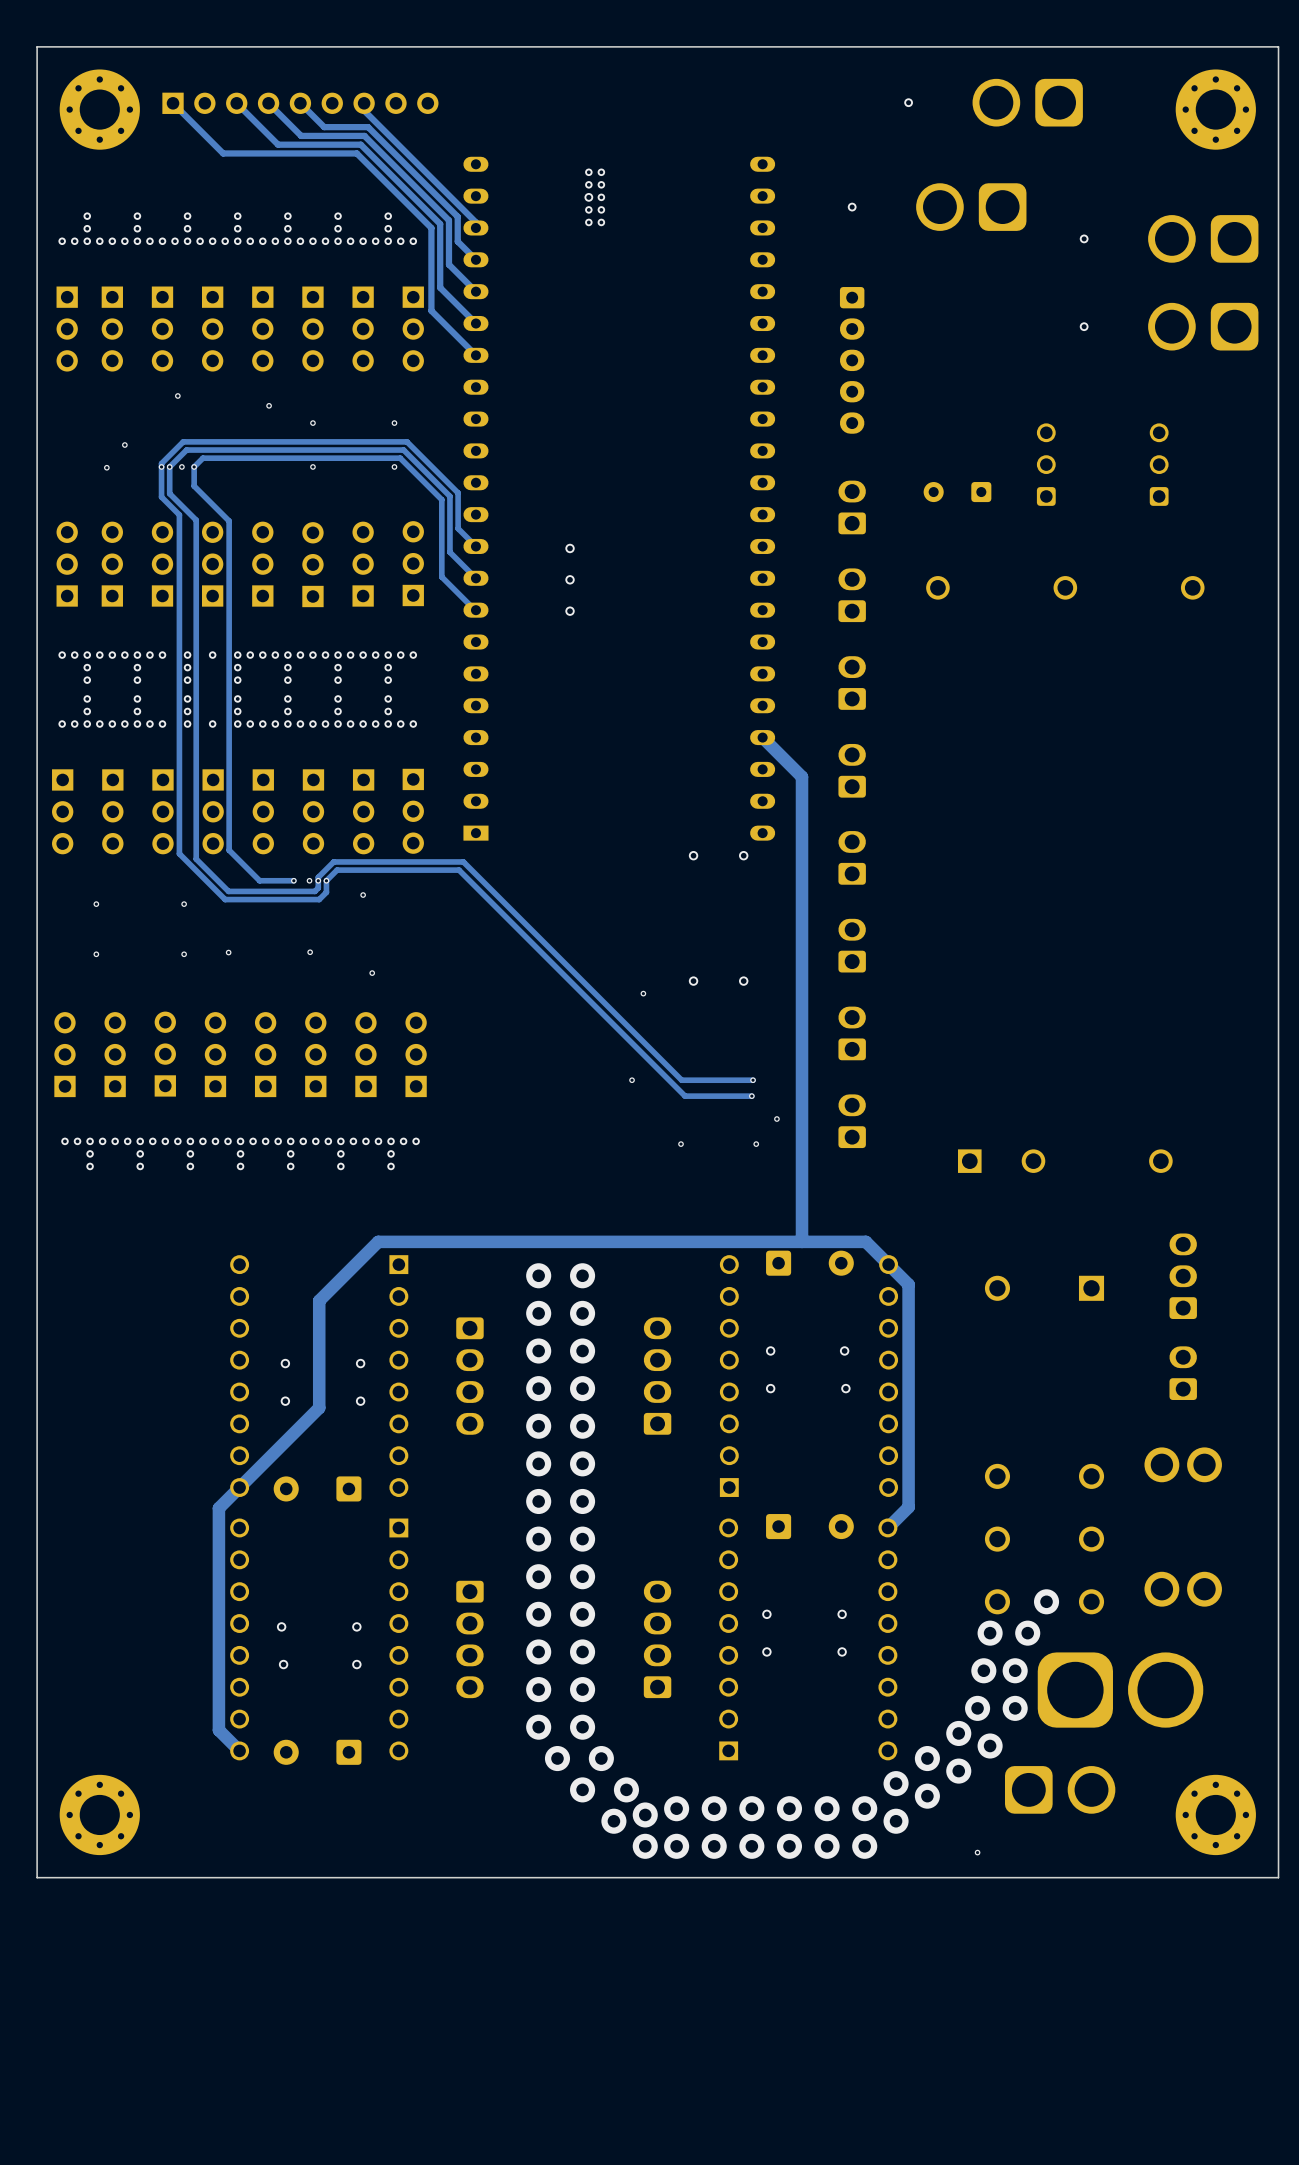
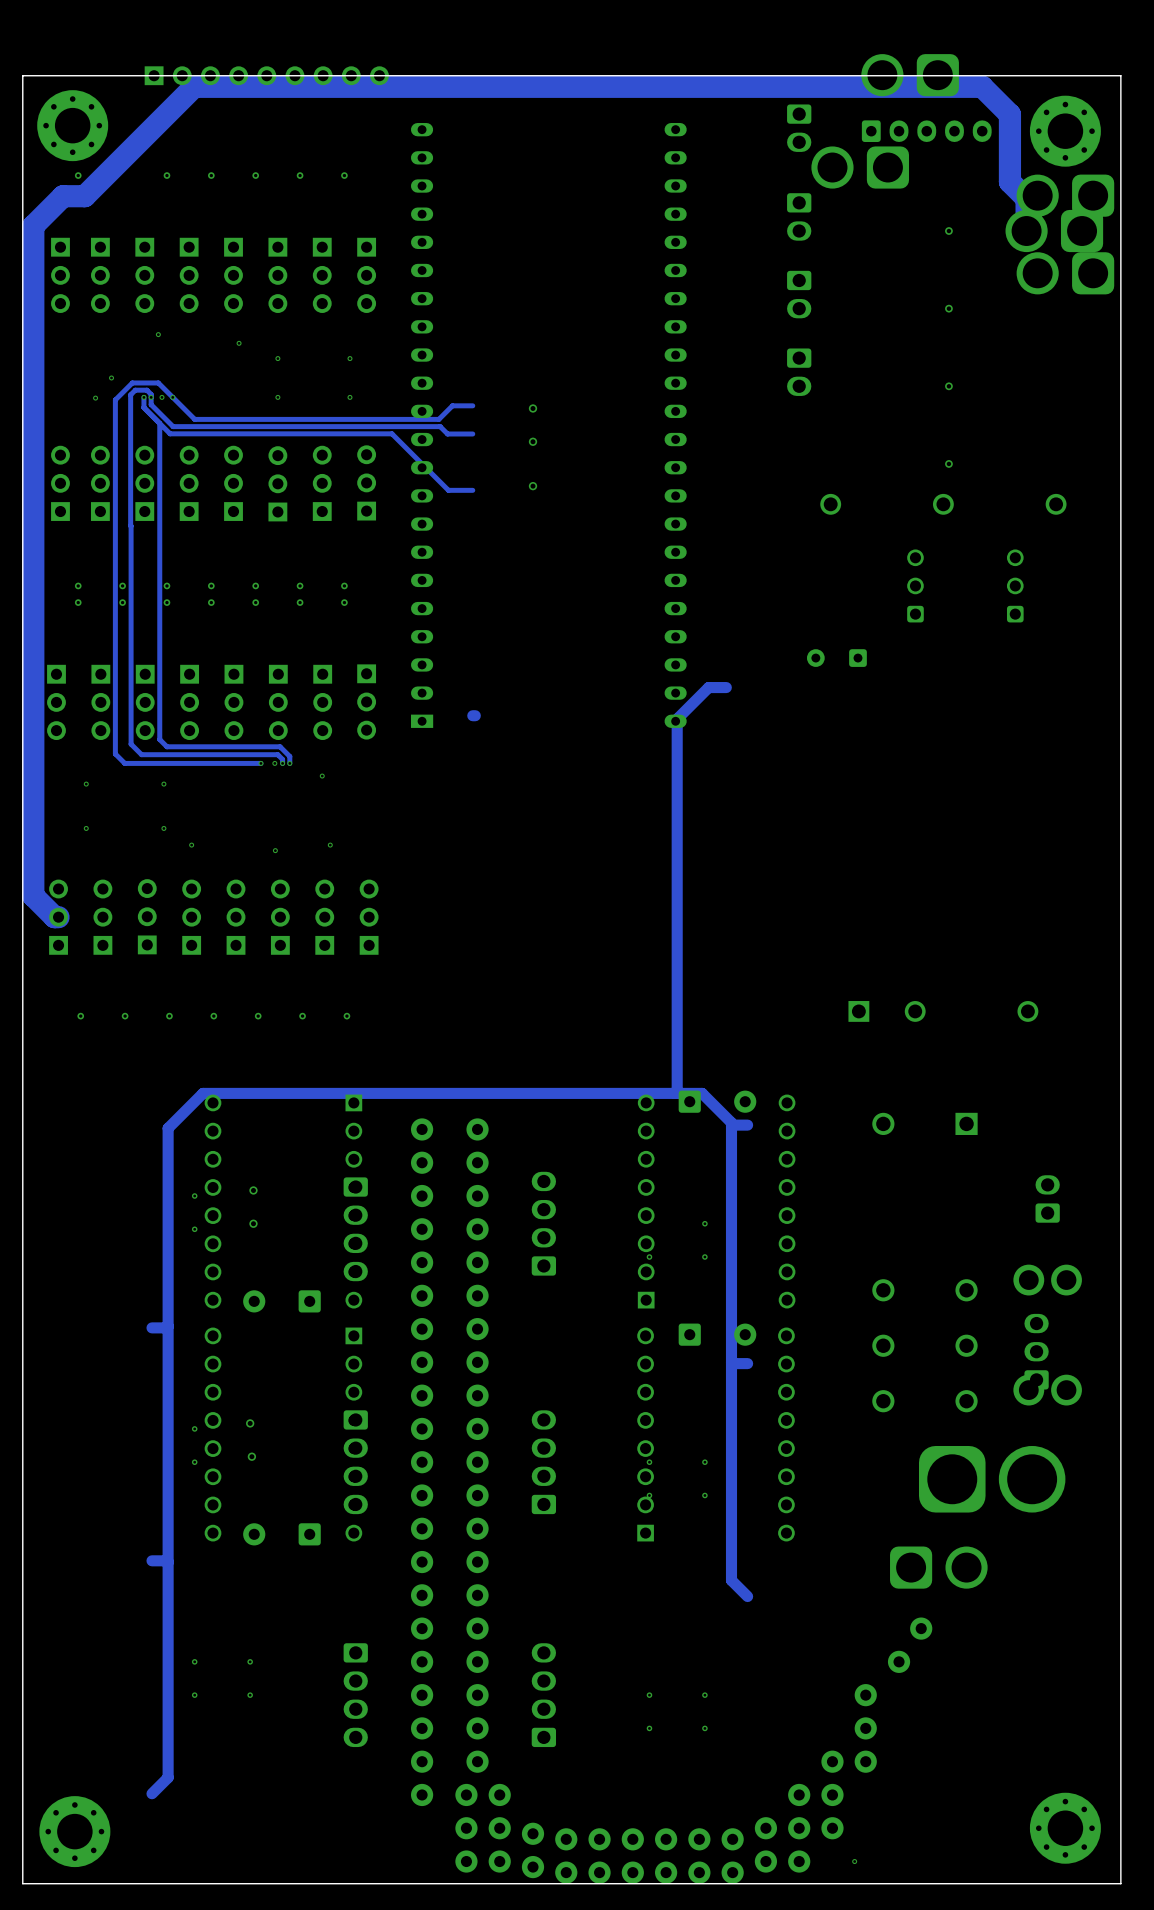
board edge: (1278, 46) (37, 46) (37, 1877) (1278, 1877) (1278, 46) -> (1120, 75) (1120, 1883) (22, 1883) (22, 75) (1120, 75)
via: (908, 102) -> none
track: (173, 103) (223, 153) (356, 153) (431, 228) (431, 310) (475, 355) -> none
track: (236, 103) (278, 144) (360, 144) (440, 224) (440, 287) (475, 323) -> none
track: (268, 103) (301, 135) (364, 135) (448, 220) (448, 264) (475, 291) -> none
track: (300, 103) (324, 127) (368, 127) (457, 216) (457, 241) (475, 259) -> none
track: (364, 103) (364, 110) (475, 222) (475, 227) -> none
part position: (99, 109) -> (72, 125)
part position: (1215, 109) -> (1065, 131)
part: none -> (799, 128)
via: (588, 172) -> none
via: (601, 172) -> none
via: (588, 184) -> none
via: (601, 184) -> none
via: (588, 197) -> none
via: (601, 197) -> none
via: (852, 207) -> none
via: (588, 209) -> none
via: (601, 209) -> none
via: (137, 216) -> none
via: (588, 222) -> none
via: (601, 222) -> none
via: (87, 228) -> none
via: (137, 228) -> none
via: (187, 228) -> none
via: (237, 228) -> none
via: (287, 228) -> none
via: (338, 228) -> none
via: (388, 228) -> none
via: (1084, 238) -> none
via: (62, 241) -> none
via: (74, 241) -> none
via: (87, 241) -> none
via: (99, 241) -> none
via: (112, 241) -> none
via: (124, 241) -> none
via: (137, 241) -> none
via: (149, 241) -> none
via: (162, 241) -> none
via: (175, 241) -> none
via: (187, 241) -> none
via: (200, 241) -> none
via: (212, 241) -> none
via: (225, 241) -> none
via: (237, 241) -> none
via: (250, 241) -> none
via: (262, 241) -> none
via: (275, 241) -> none
via: (287, 241) -> none
via: (300, 241) -> none
via: (312, 241) -> none
via: (325, 241) -> none
via: (338, 241) -> none
via: (350, 241) -> none
via: (363, 241) -> none
via: (375, 241) -> none
via: (388, 241) -> none
via: (400, 241) -> none
via: (413, 241) -> none
part: none -> (799, 216)
via: none -> (948, 231)
track: none -> (1026, 231) (1026, 198) (1009, 181) (1009, 114) (982, 86) (194, 86) (84, 196) (63, 196) (33, 226) (33, 895) (54, 917) (58, 917)
part: none -> (1054, 231)
via: (1084, 326) -> none
part: none -> (799, 294)
part rotation: 0° (852, 360) -> 90° counterclockwise (926, 131)
part position: (852, 360) -> (926, 131)
via: none -> (948, 308)
part: none -> (799, 372)
via: none -> (948, 386)
part: (1046, 464) -> none
part: (1159, 464) -> none
track: (161, 466) (161, 463) (183, 441) (407, 441) (458, 492) (458, 528) (475, 546) -> none
track: (169, 466) (186, 450) (403, 450) (449, 496) (449, 552) (475, 578) -> (151, 397) (151, 394) (146, 390) (135, 390) (130, 394) (131, 744) (141, 754) (277, 754) (282, 760)
track: (169, 475) (169, 493) (196, 520) (196, 859) (228, 891) (314, 891) (318, 888) (318, 880) -> (151, 404) (173, 426) (440, 426) (447, 433) (472, 433)
track: (161, 478) (161, 497) (179, 514) -> (159, 423) (159, 439)
track: none -> (143, 407) (170, 433) (391, 433) (448, 490) (472, 490)
via: none -> (533, 408)
part position: (957, 492) -> (836, 658)
part: (852, 507) -> none
via: none -> (533, 441)
via: none -> (948, 463)
via: (570, 548) -> none
via: none -> (533, 486)
via: (570, 579) -> none
part: (852, 595) -> none
track: (475, 610) (441, 577) (441, 499) (400, 458) (202, 458) (194, 466) (194, 486) (229, 521) (229, 850) (259, 880) -> (472, 405) (452, 405) (438, 419) (194, 419) (158, 382) (132, 382) (115, 399) (115, 753) (124, 763) (230, 763)
via: (570, 611) -> none
via: (62, 655) -> none
via: (74, 655) -> none
via: (87, 655) -> none
via: (99, 655) -> none
via: (112, 655) -> none
via: (124, 655) -> none
via: (137, 655) -> none
via: (149, 655) -> none
via: (162, 655) -> none
via: (187, 655) -> none
via: (212, 655) -> none
via: (237, 655) -> none
via: (250, 655) -> none
via: (262, 655) -> none
via: (275, 655) -> none
via: (287, 655) -> none
via: (300, 655) -> none
via: (312, 655) -> none
via: (325, 655) -> none
via: (338, 655) -> none
via: (350, 655) -> none
via: (363, 655) -> none
via: (375, 655) -> none
via: (388, 655) -> none
via: (400, 655) -> none
via: (413, 655) -> none
via: (87, 667) -> none
via: (137, 667) -> none
via: (187, 667) -> none
via: (237, 667) -> none
via: (287, 667) -> none
via: (338, 667) -> none
via: (388, 667) -> none
part: none -> (915, 585)
part: none -> (1015, 585)
part: (852, 683) -> none
via: (87, 711) -> none
via: (137, 711) -> none
via: (187, 711) -> none
via: (237, 711) -> none
via: (287, 711) -> none
via: (338, 711) -> none
via: (388, 711) -> none
via: (62, 724) -> none
via: (74, 724) -> none
via: (87, 724) -> none
via: (99, 724) -> none
via: (112, 724) -> none
via: (124, 724) -> none
via: (137, 724) -> none
via: (149, 724) -> none
via: (162, 724) -> none
via: (187, 724) -> none
via: (212, 724) -> none
via: (237, 724) -> none
via: (250, 724) -> none
via: (262, 724) -> none
via: (275, 724) -> none
via: (287, 724) -> none
via: (300, 724) -> none
via: (312, 724) -> none
via: (325, 724) -> none
via: (338, 724) -> none
via: (350, 724) -> none
via: (363, 724) -> none
via: (375, 724) -> none
via: (388, 724) -> none
via: (400, 724) -> none
via: (413, 724) -> none
track: (762, 737) (802, 776) (802, 1241) -> none
part: (852, 770) -> none
track: none -> (726, 687) (708, 687) (677, 719) (677, 1091) (675, 1093)
track: none -> (475, 715) (472, 715)
via: (693, 855) -> none
via: (743, 855) -> none
part: (852, 857) -> none
track: (187, 861) (225, 899) (319, 899) (326, 892) (326, 880) (337, 870) (459, 870) (685, 1096) (751, 1096) -> (166, 746) (280, 746) (289, 756) (289, 763)
track: (318, 877) (333, 861) (463, 861) (681, 1080) (753, 1080) -> none
part: (852, 945) -> none
via position: (228, 952) -> (191, 845)
via position: (310, 952) -> (275, 850)
via: (693, 981) -> none
via: (743, 981) -> none
via: (643, 993) -> none
part: (852, 1033) -> none
via: (632, 1080) -> none
via: (753, 1080) -> none
via: (751, 1096) -> none
via: (776, 1119) -> none
part: (852, 1121) -> none
via: (64, 1141) -> none
via: (77, 1141) -> none
via: (90, 1141) -> none
via: (102, 1141) -> none
via: (115, 1141) -> none
via: (127, 1141) -> none
via: (140, 1141) -> none
via: (152, 1141) -> none
via: (165, 1141) -> none
via: (177, 1141) -> none
via: (190, 1141) -> none
via: (202, 1141) -> none
via: (215, 1141) -> none
via: (228, 1141) -> none
via: (240, 1141) -> none
via: (253, 1141) -> none
via: (265, 1141) -> none
via: (278, 1141) -> none
via: (290, 1141) -> none
via: (303, 1141) -> none
via: (315, 1141) -> none
via: (328, 1141) -> none
via: (340, 1141) -> none
via: (353, 1141) -> none
via: (365, 1141) -> none
via: (378, 1141) -> none
via: (391, 1141) -> none
via: (403, 1141) -> none
via: (416, 1141) -> none
via: (681, 1144) -> none
via: (756, 1144) -> none
via: (90, 1153) -> none
via: (140, 1153) -> none
via: (190, 1153) -> none
via: (240, 1153) -> none
via: (290, 1153) -> none
via: (340, 1153) -> none
via: (391, 1153) -> none
via: (538, 1275) -> none
via: (582, 1275) -> none
part position: (1183, 1276) -> (1036, 1351)
track: none -> (731, 1123) (747, 1125)
via: none -> (422, 1129)
via: none -> (477, 1129)
via: (538, 1313) -> none
via: (582, 1313) -> none
via: none -> (422, 1162)
via: none -> (477, 1162)
via: (770, 1350) -> none
via: (844, 1350) -> none
via: (538, 1351) -> none
via: (582, 1351) -> none
via: (360, 1363) -> none
via: none -> (194, 1196)
via: none -> (422, 1196)
via: none -> (477, 1196)
part: (469, 1376) -> none
part position: (657, 1376) -> (543, 1223)
via: (538, 1388) -> none
via: (582, 1388) -> none
via: (770, 1388) -> none
via: (845, 1388) -> none
via: (360, 1401) -> none
via: none -> (704, 1223)
via: none -> (194, 1229)
part: none -> (355, 1229)
via: none -> (422, 1229)
via: none -> (477, 1229)
via: (538, 1426) -> none
via: (582, 1426) -> none
via: none -> (649, 1257)
via: none -> (704, 1256)
via: none -> (422, 1262)
via: none -> (477, 1262)
via: (538, 1463) -> none
via: (582, 1463) -> none
via: none -> (422, 1295)
via: none -> (477, 1295)
via: (538, 1501) -> none
via: (582, 1501) -> none
track: none -> (168, 1326) (151, 1327)
via: none -> (422, 1329)
via: none -> (477, 1329)
track: (887, 1527) (908, 1507) (908, 1284) (865, 1241) (378, 1241) (319, 1300) (319, 1407) (218, 1508) (218, 1730) (239, 1750) -> none
via: (538, 1539) -> none
via: (582, 1539) -> none
via: none -> (422, 1362)
via: none -> (477, 1362)
track: none -> (731, 1362) (747, 1363)
via: (538, 1576) -> none
via: (582, 1576) -> none
via: none -> (422, 1395)
via: none -> (477, 1395)
via: (1046, 1601) -> none
via: (538, 1614) -> none
via: (582, 1614) -> none
via: (766, 1614) -> none
via: (842, 1614) -> none
via: (356, 1626) -> none
via: none -> (194, 1428)
via: none -> (422, 1428)
via: none -> (477, 1428)
via: (990, 1633) -> none
via: (1027, 1633) -> none
part: (469, 1639) -> none
part position: (657, 1639) -> (543, 1462)
via: (538, 1651) -> none
via: (582, 1651) -> none
via: (766, 1651) -> none
via: (842, 1651) -> none
via: (356, 1664) -> none
via: none -> (194, 1462)
part: none -> (355, 1462)
via: none -> (422, 1462)
via: none -> (477, 1462)
via: none -> (649, 1462)
via: none -> (704, 1462)
via: (983, 1670) -> none
via: (1015, 1670) -> none
via: (538, 1689) -> none
via: (582, 1689) -> none
via: none -> (422, 1495)
via: none -> (477, 1495)
via: none -> (649, 1495)
via: none -> (704, 1495)
via: (977, 1708) -> none
via: (1015, 1708) -> none
via: (538, 1727) -> none
via: (582, 1727) -> none
via: (958, 1733) -> none
via: none -> (422, 1528)
via: none -> (477, 1528)
via: (990, 1746) -> none
via: (557, 1758) -> none
via: (601, 1758) -> none
via: (927, 1758) -> none
via: (958, 1771) -> none
track: none -> (151, 1560) (168, 1562)
via: none -> (422, 1562)
via: none -> (477, 1562)
via: (896, 1783) -> none
via: (582, 1789) -> none
via: (626, 1789) -> none
via: (927, 1796) -> none
via: (676, 1808) -> none
via: (714, 1808) -> none
via: (751, 1808) -> none
via: (789, 1808) -> none
via: (827, 1808) -> none
via: (864, 1808) -> none
part position: (99, 1814) -> (74, 1831)
via: (645, 1814) -> none
part position: (1215, 1814) -> (1065, 1828)
via: none -> (422, 1595)
via: none -> (477, 1595)
via: (613, 1821) -> none
via: (896, 1821) -> none
track: none -> (747, 1596) (731, 1580) (731, 1122) (702, 1093) (203, 1093) (168, 1128) (168, 1777) (151, 1793)
via: (645, 1846) -> none
via: (676, 1846) -> none
via: (714, 1846) -> none
via: (751, 1846) -> none
via: (789, 1846) -> none
via: (827, 1846) -> none
via: (864, 1846) -> none
via: (977, 1852) -> none
via: none -> (422, 1628)
via: none -> (477, 1628)
via: none -> (921, 1628)
via: none -> (194, 1661)
via: none -> (250, 1661)
via: none -> (422, 1661)
via: none -> (477, 1661)
via: none -> (899, 1661)
via: none -> (194, 1695)
via: none -> (250, 1695)
part: none -> (355, 1695)
via: none -> (422, 1695)
via: none -> (477, 1695)
part: none -> (543, 1695)
via: none -> (649, 1695)
via: none -> (704, 1695)
via: none -> (865, 1695)
via: none -> (422, 1728)
via: none -> (477, 1728)
via: none -> (649, 1728)
via: none -> (704, 1728)
via: none -> (865, 1728)
via: none -> (422, 1761)
via: none -> (477, 1761)
via: none -> (832, 1761)
via: none -> (865, 1761)
via: none -> (422, 1794)
via: none -> (466, 1794)
via: none -> (499, 1794)
via: none -> (799, 1794)
via: none -> (832, 1794)
via: none -> (466, 1828)
via: none -> (499, 1828)
via: none -> (765, 1828)
via: none -> (799, 1828)
via: none -> (832, 1828)
via: none -> (533, 1833)
via: none -> (566, 1839)
via: none -> (599, 1839)
via: none -> (632, 1839)
via: none -> (666, 1839)
via: none -> (699, 1839)
via: none -> (732, 1839)
via: none -> (466, 1861)
via: none -> (499, 1861)
via: none -> (765, 1861)
via: none -> (799, 1861)
via: none -> (854, 1861)
via: none -> (533, 1867)
via: none -> (566, 1872)
via: none -> (599, 1872)
via: none -> (632, 1872)
via: none -> (666, 1872)
via: none -> (699, 1872)
via: none -> (732, 1872)

